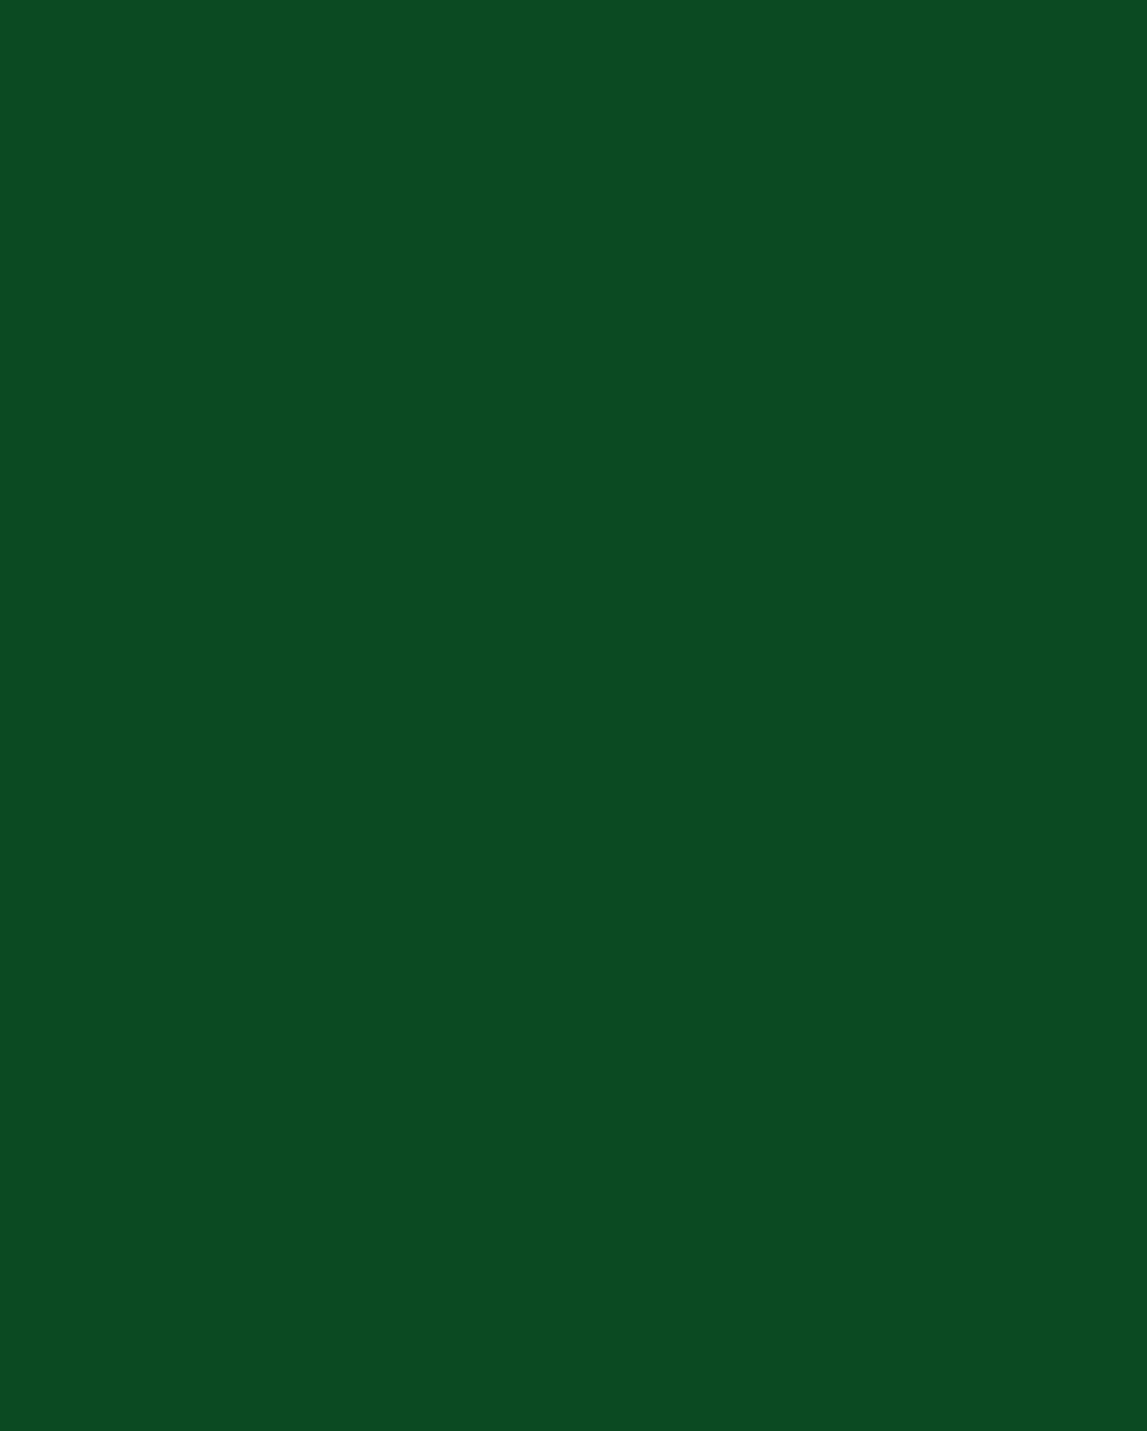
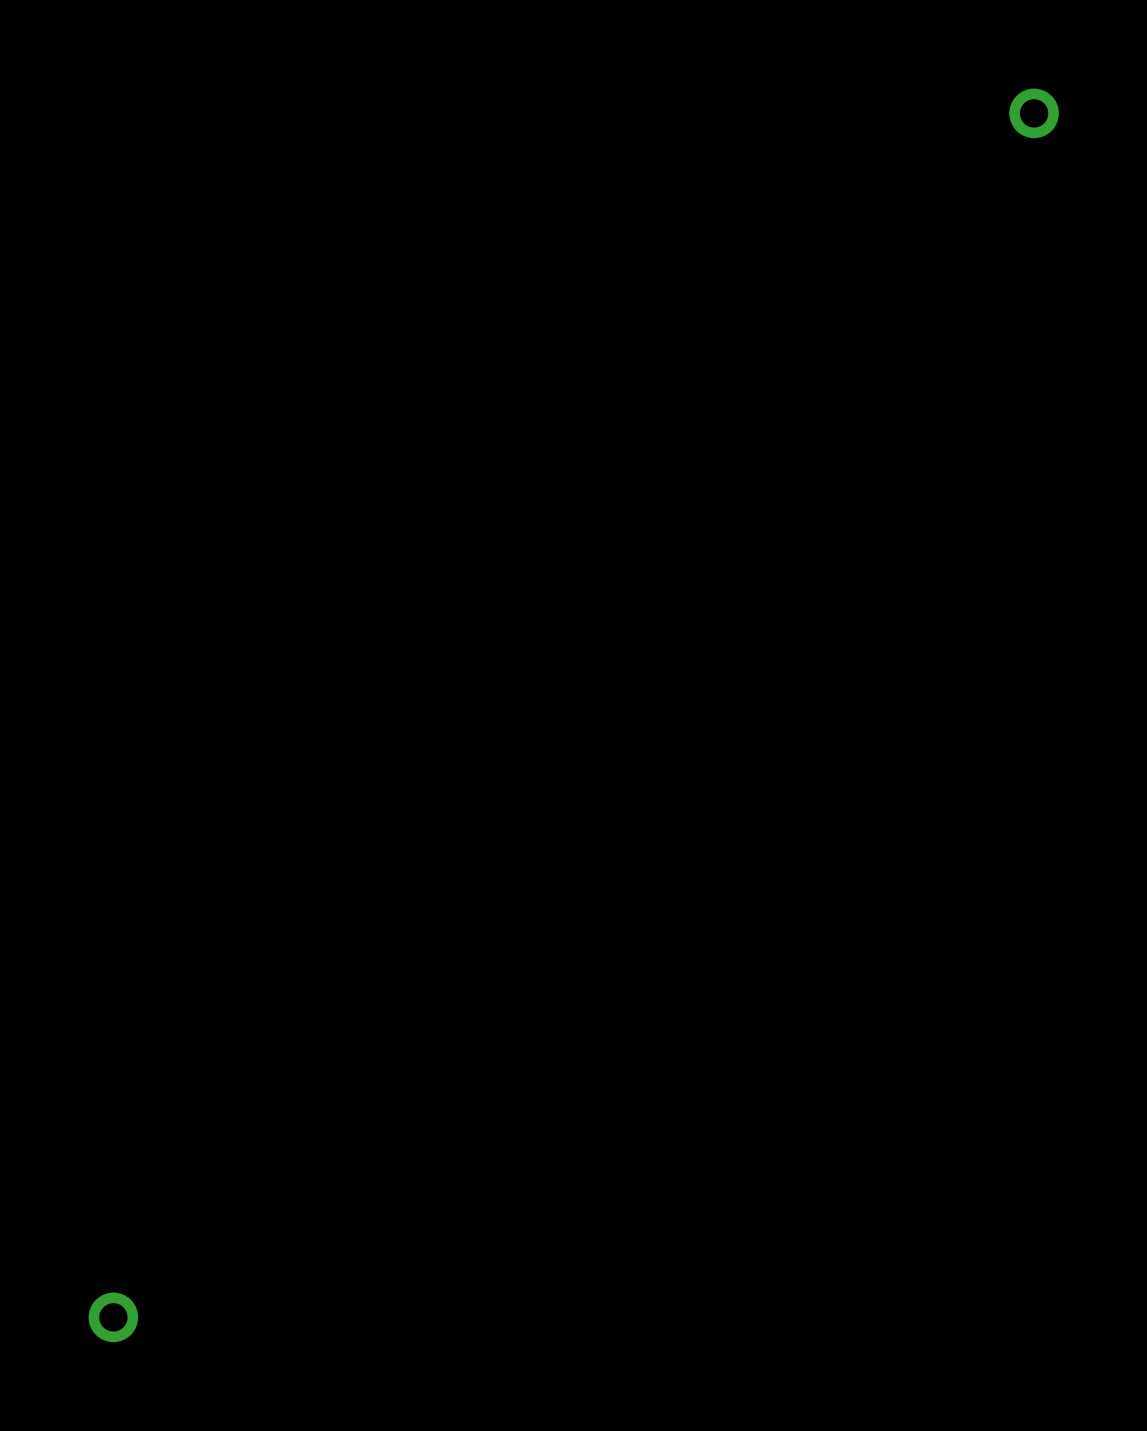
part: none -> (1034, 113)
part: none -> (113, 1317)

